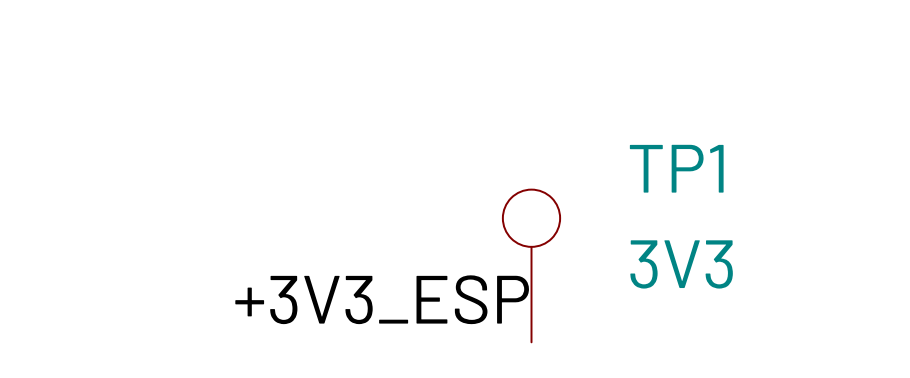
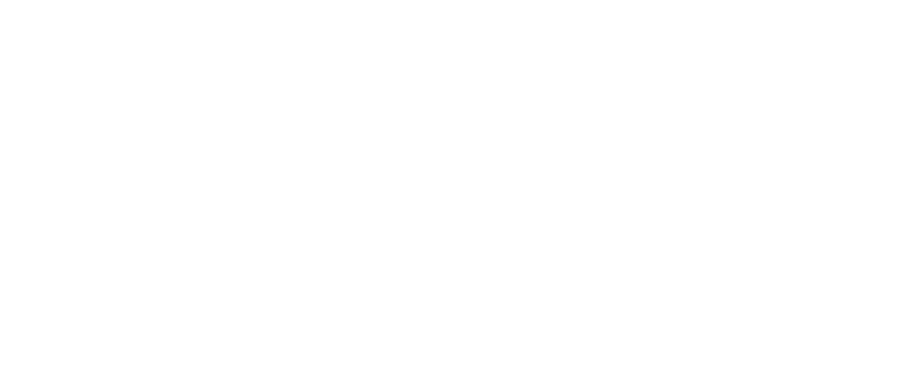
TP1: 3V3 (531, 265) -> none
label: +3V3_ESP (382, 299) -> none

